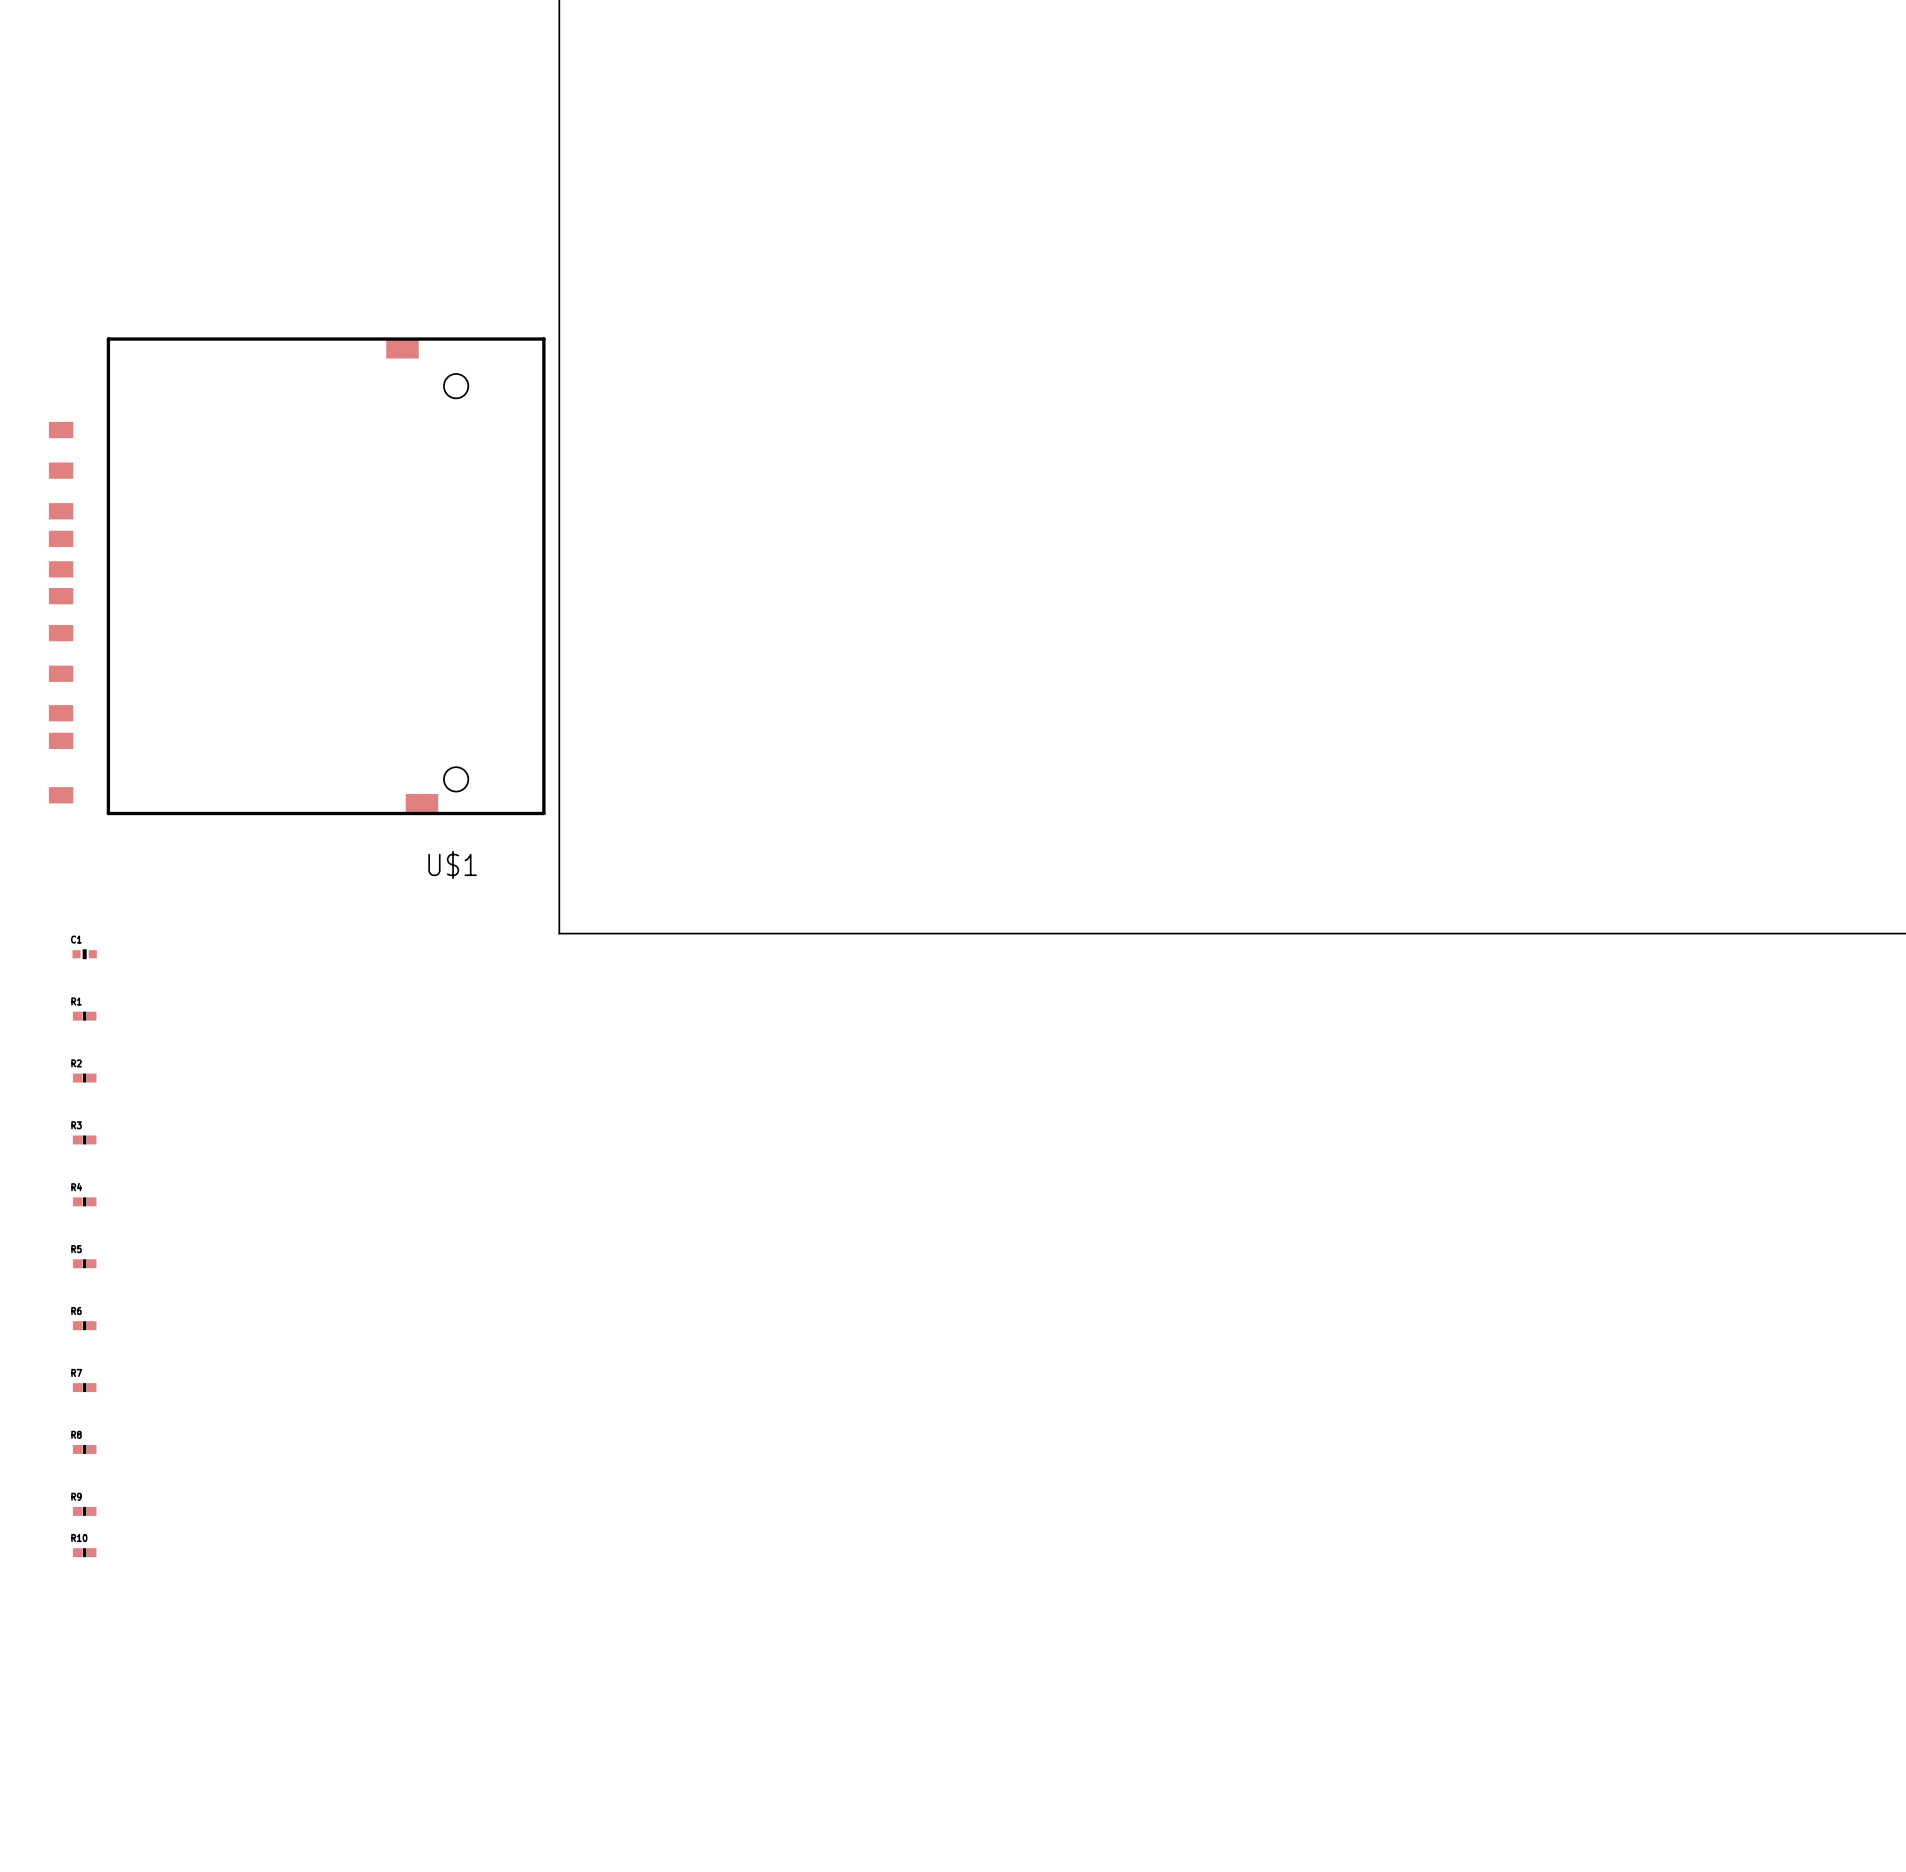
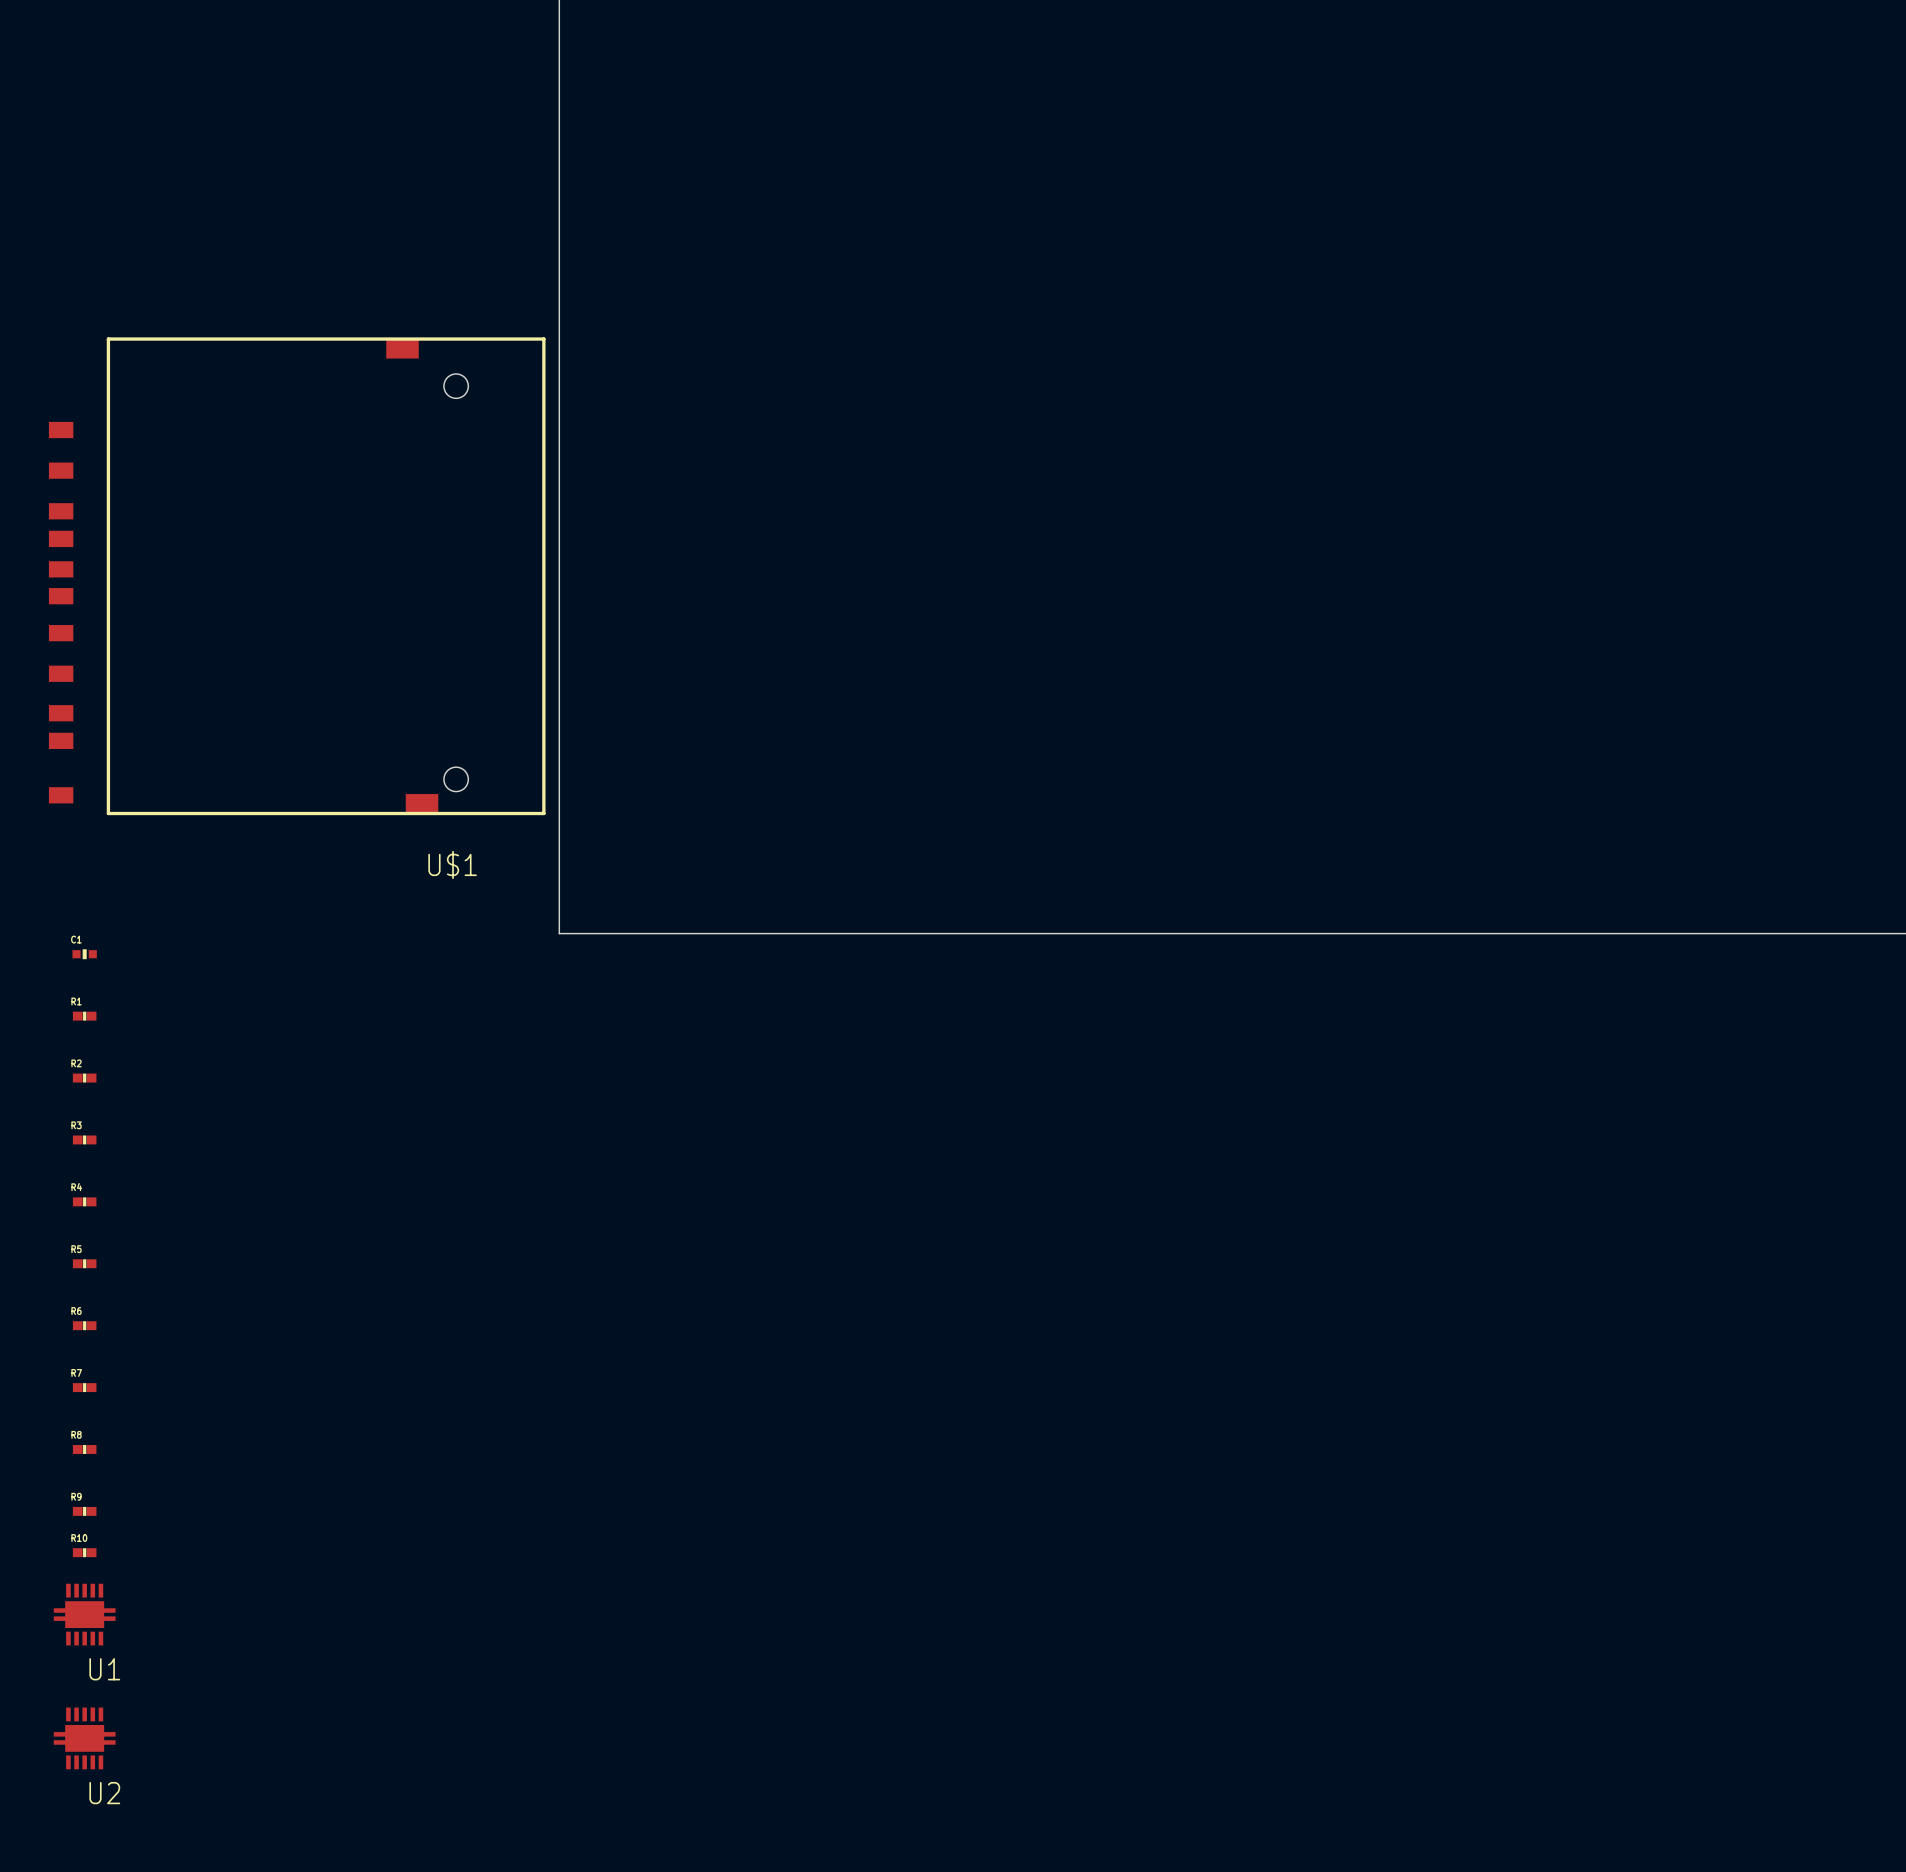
U1: none -> (84, 1614)
U2: none -> (84, 1738)

